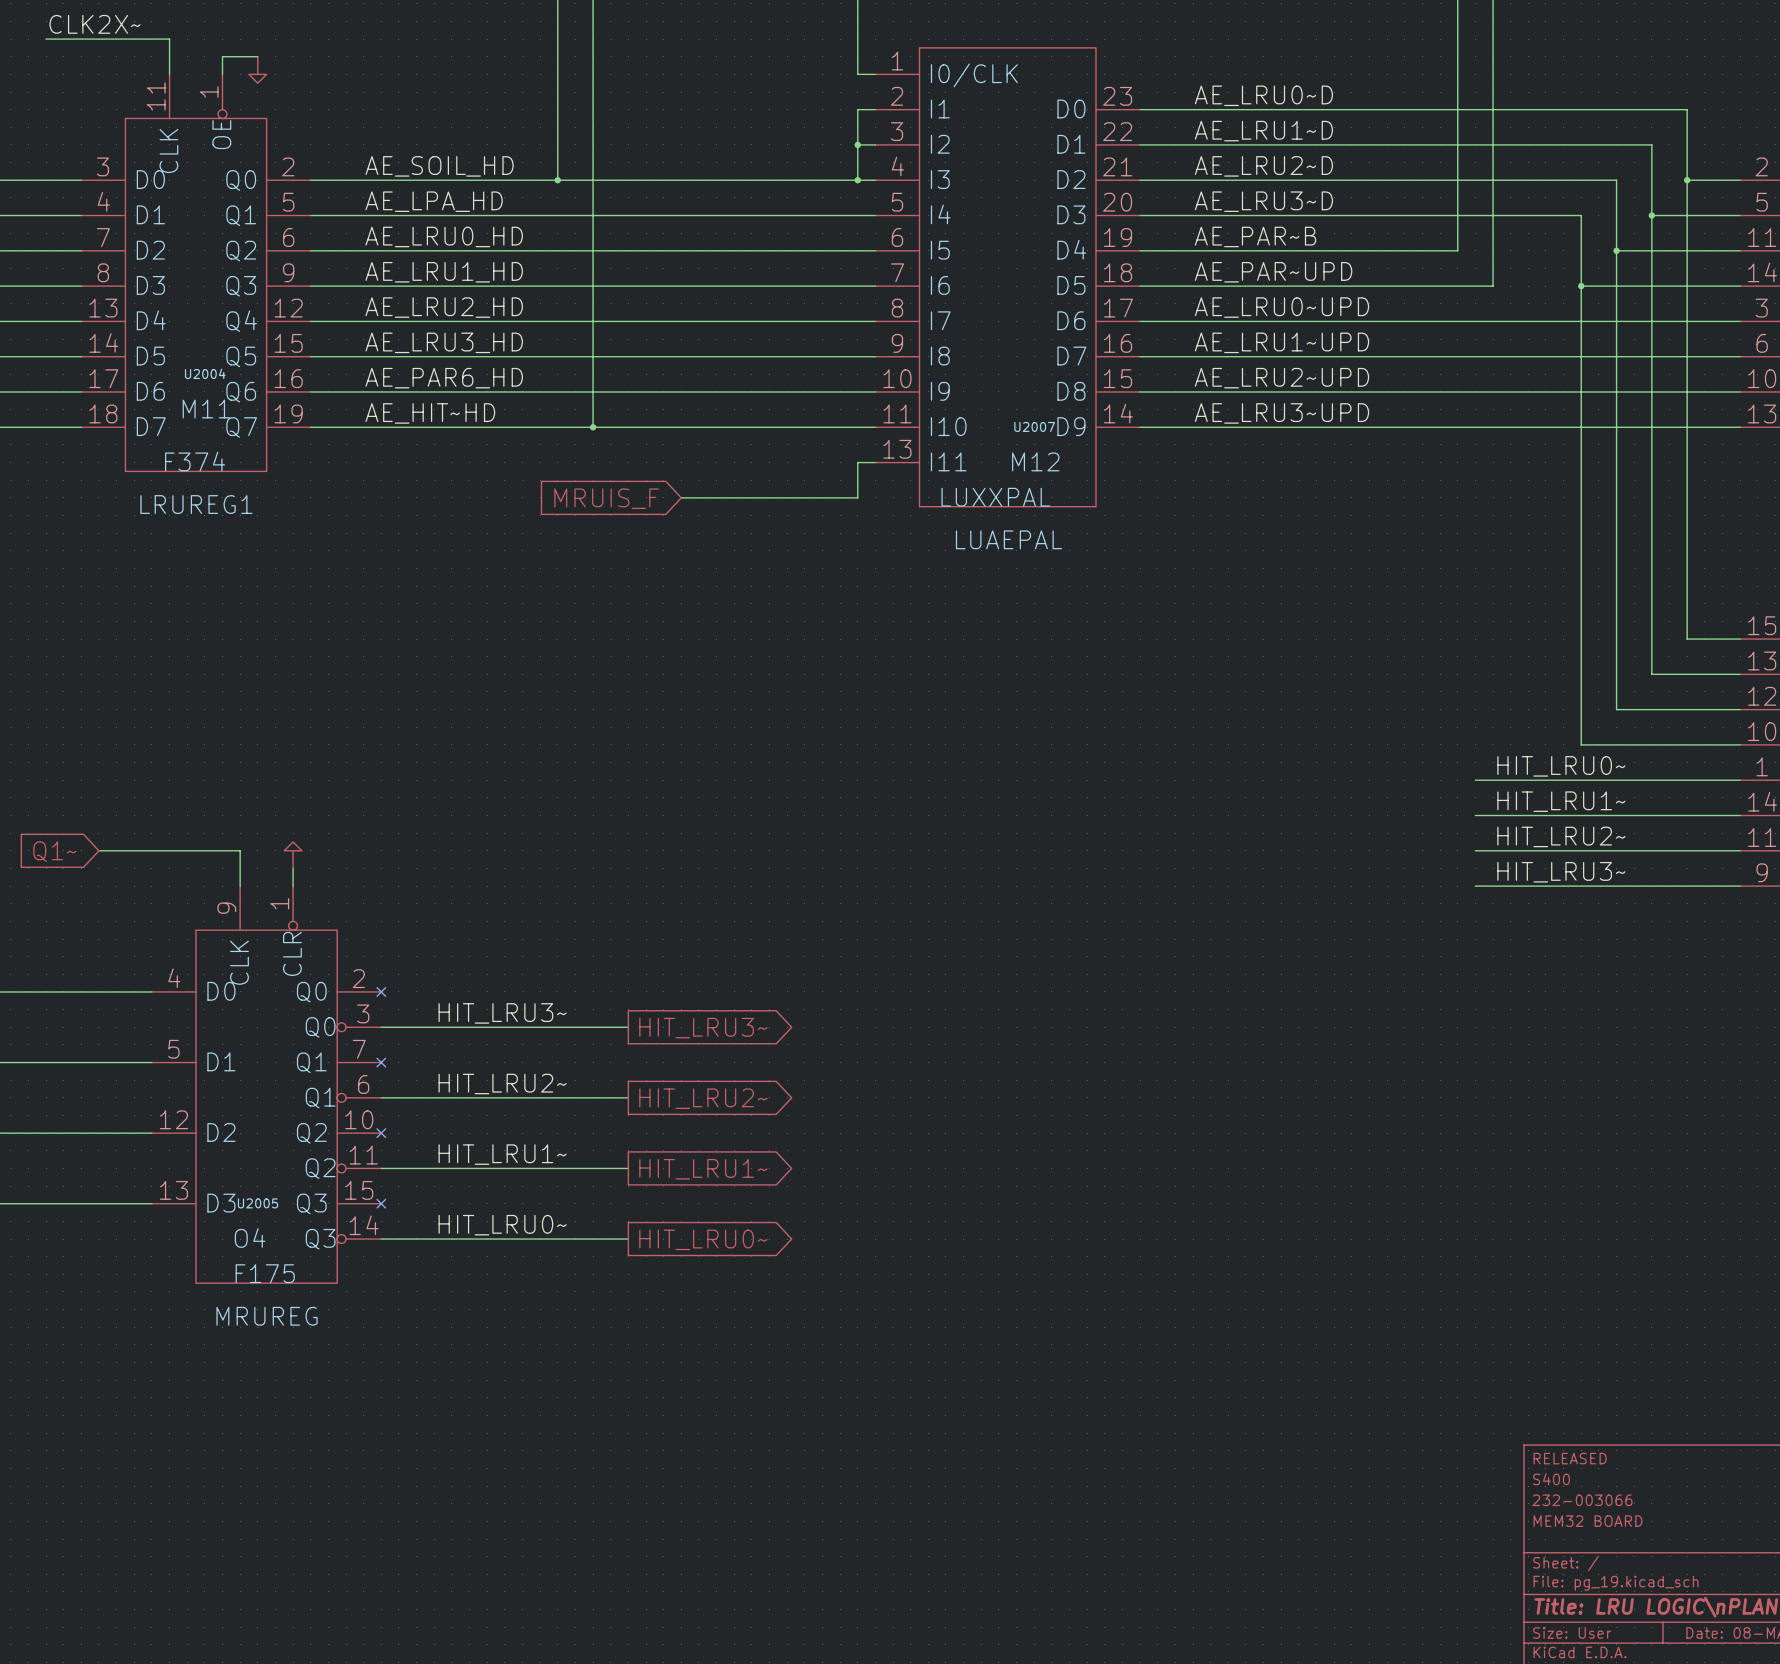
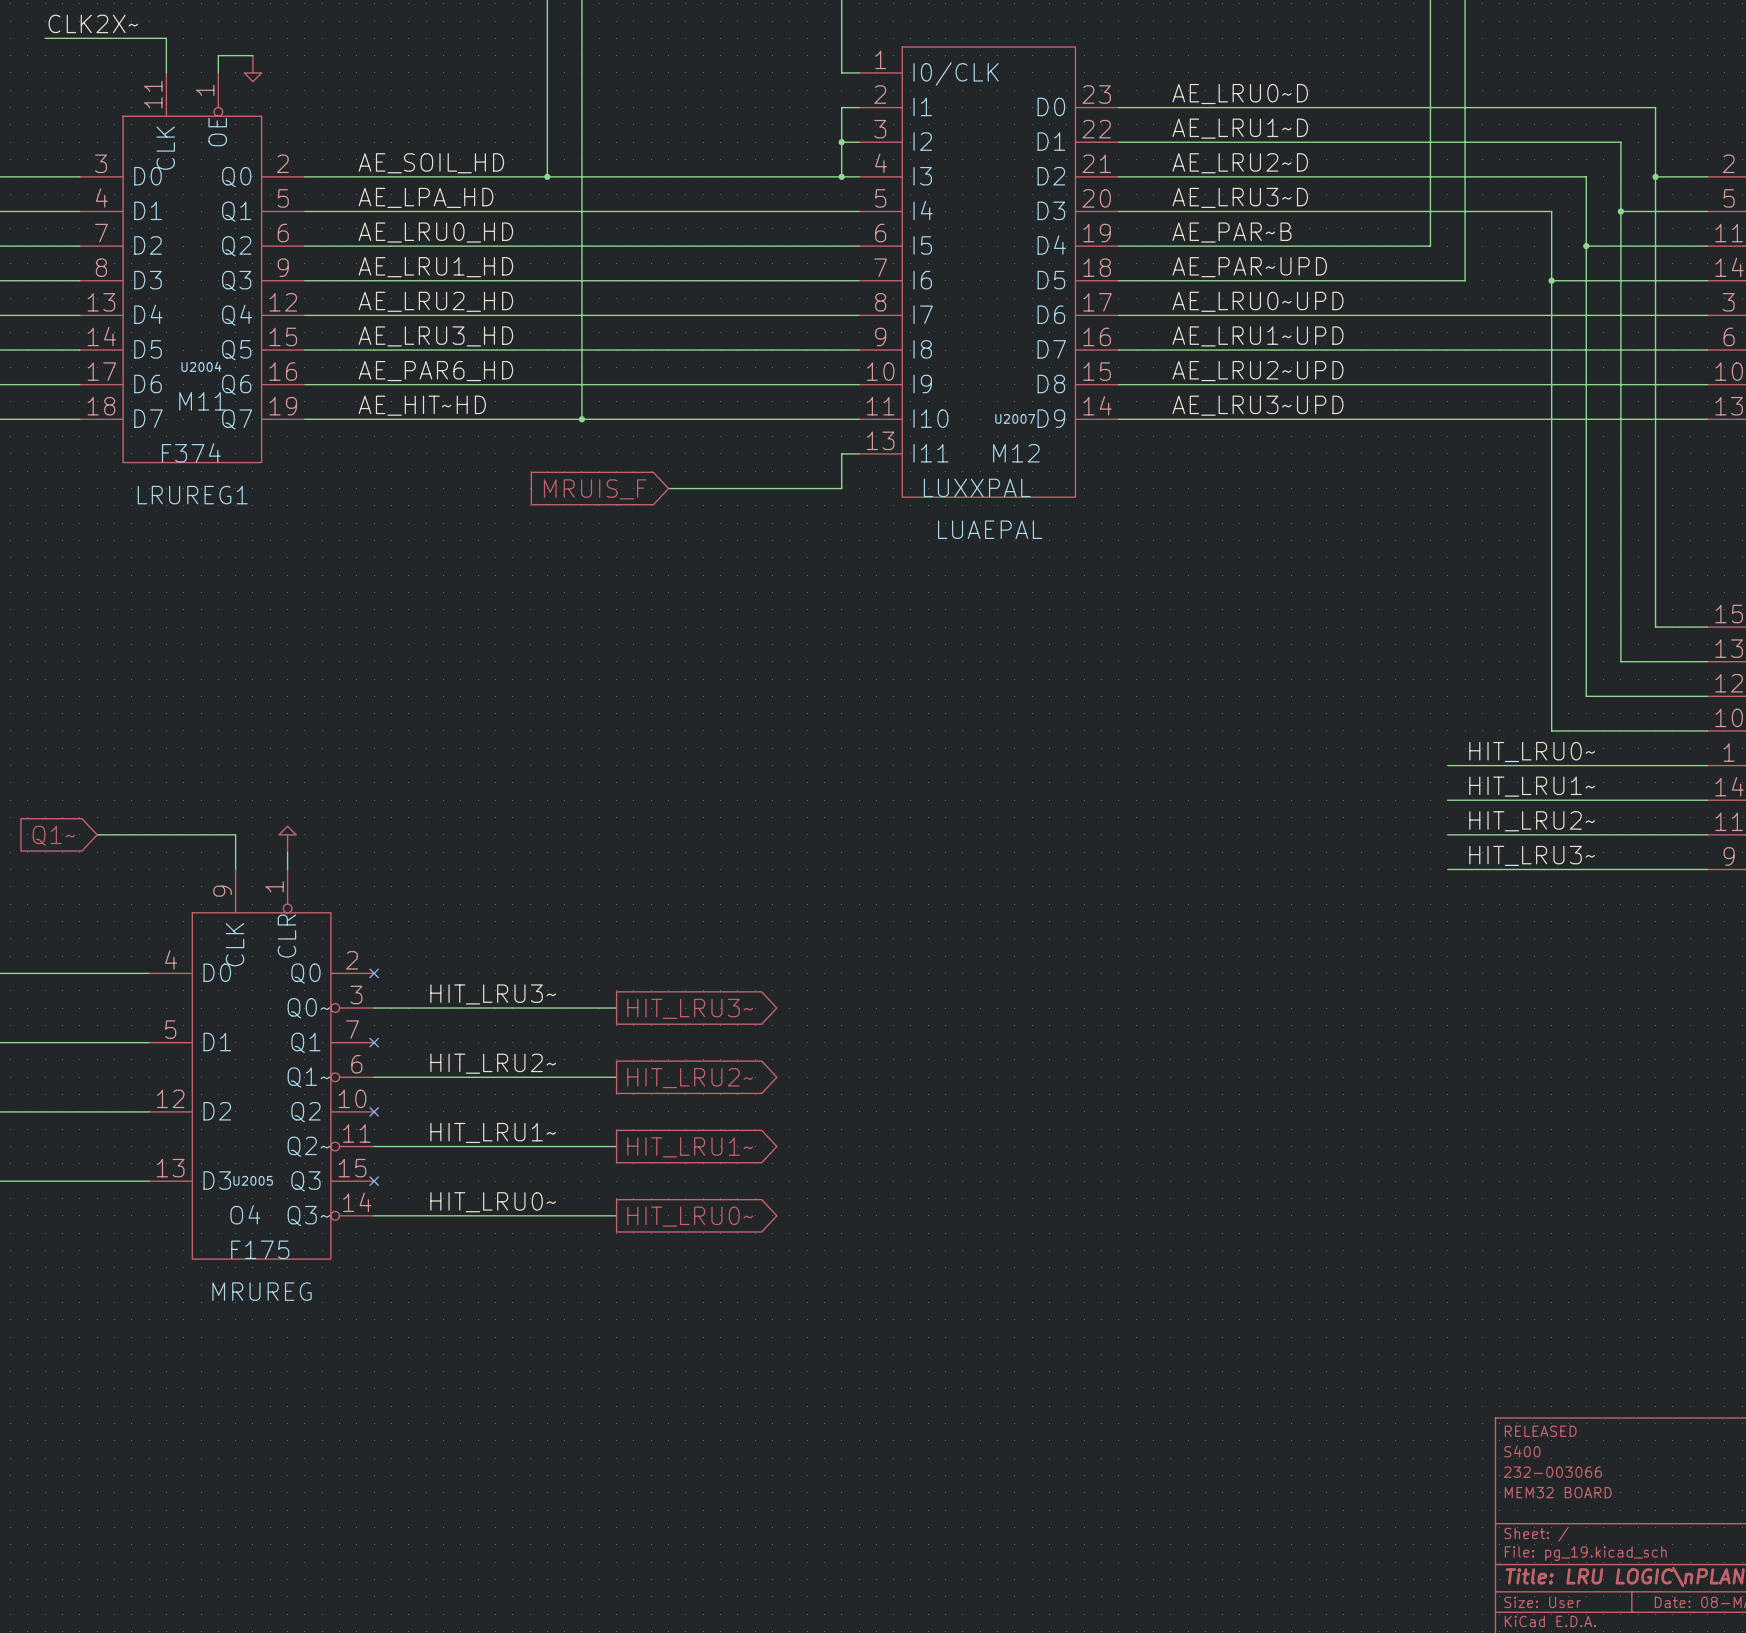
U2005 pin name: Q0 (320, 1027) -> Q0~ (308, 1008)
U2005 pin name: Q1 (320, 1098) -> Q1~ (308, 1077)
U2005 pin name: Q2 (320, 1168) -> Q2~ (308, 1146)
U2005 pin name: Q3 (320, 1239) -> Q3~ (308, 1215)

